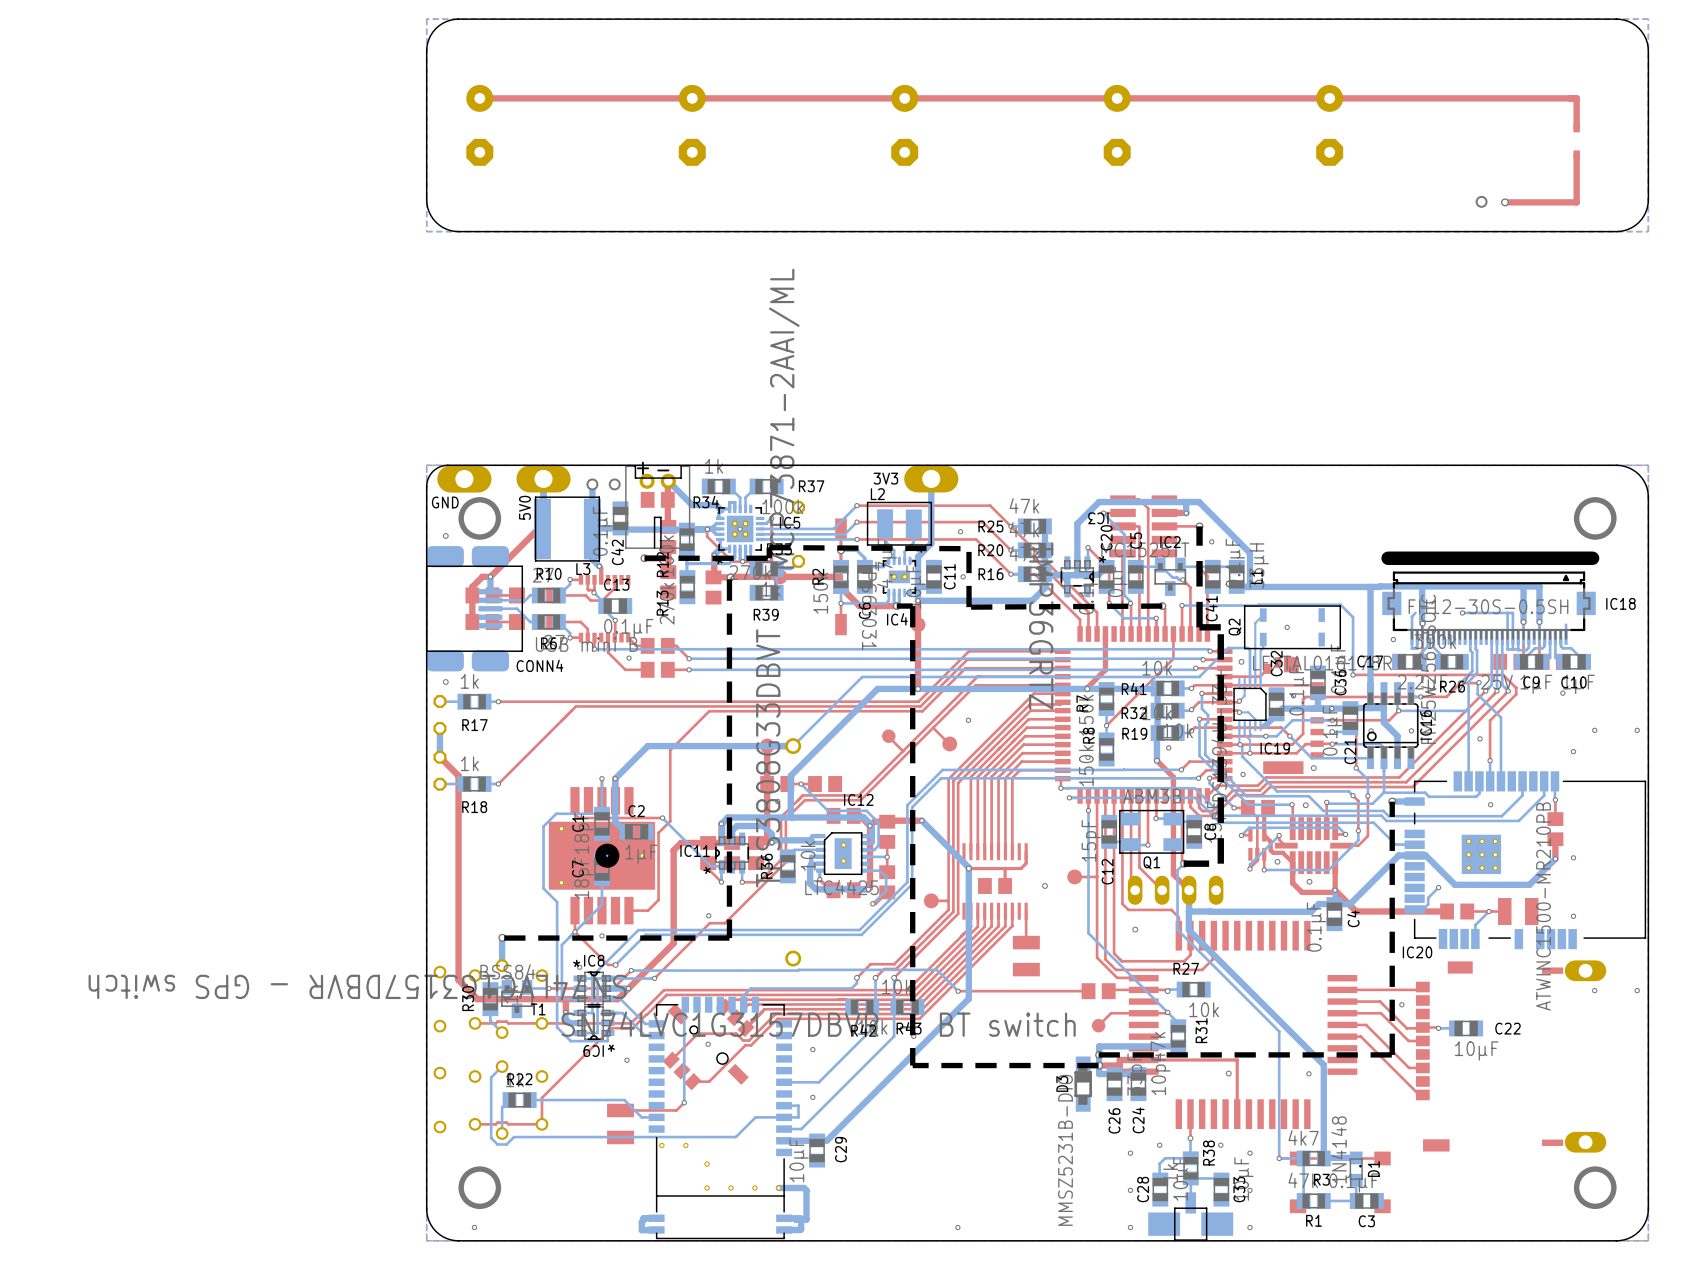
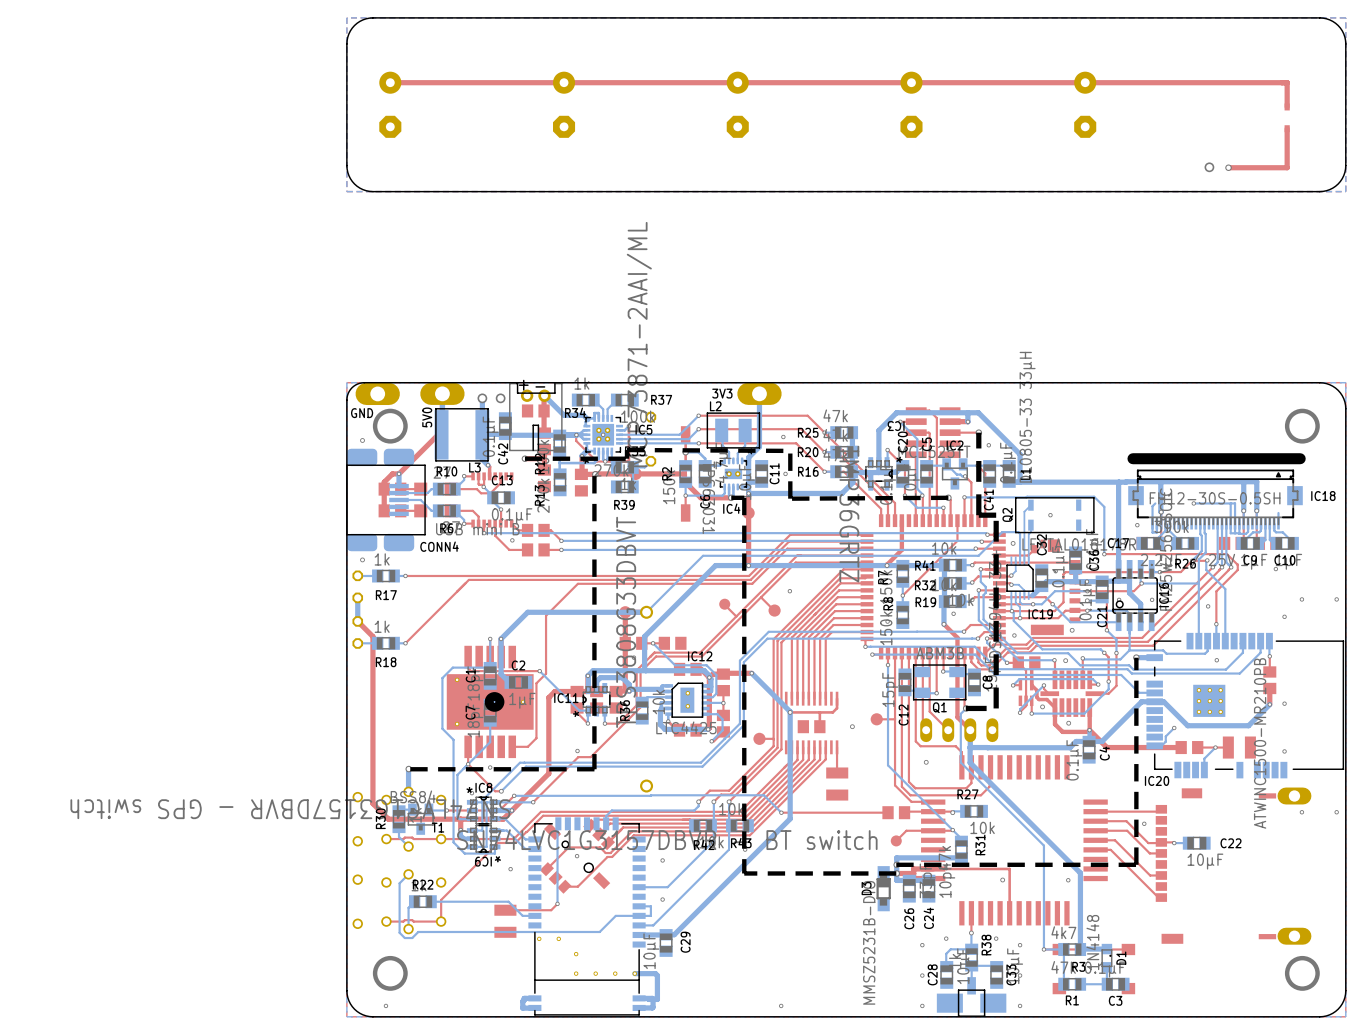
L1 value: 33µH (1259, 565) -> DL0805-33 33µH (1027, 417)

